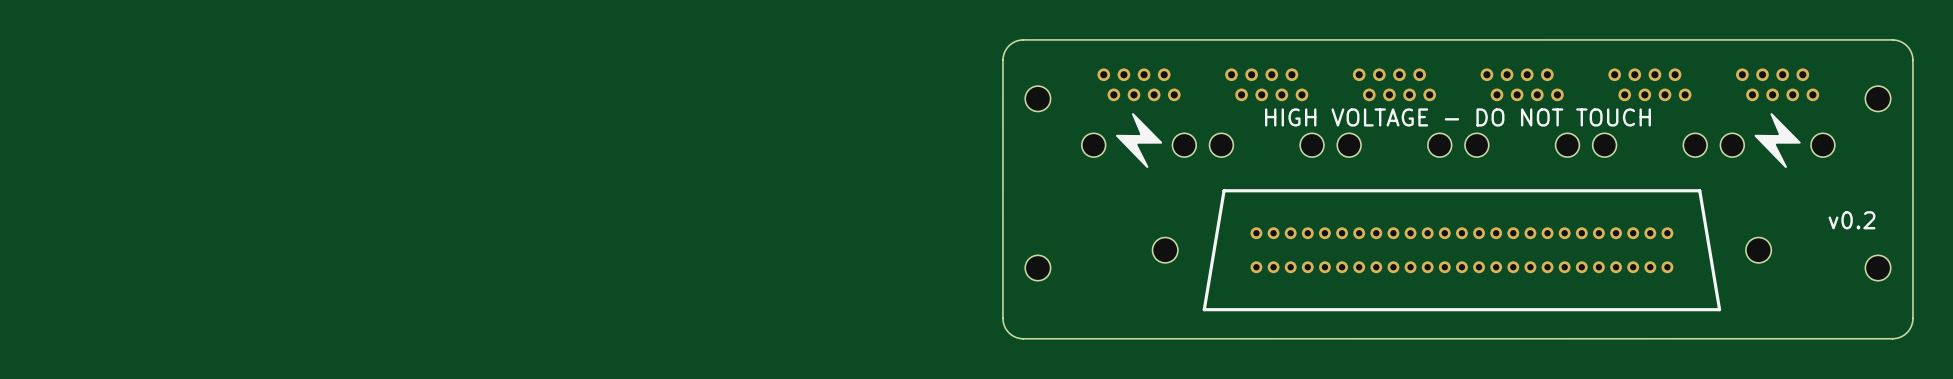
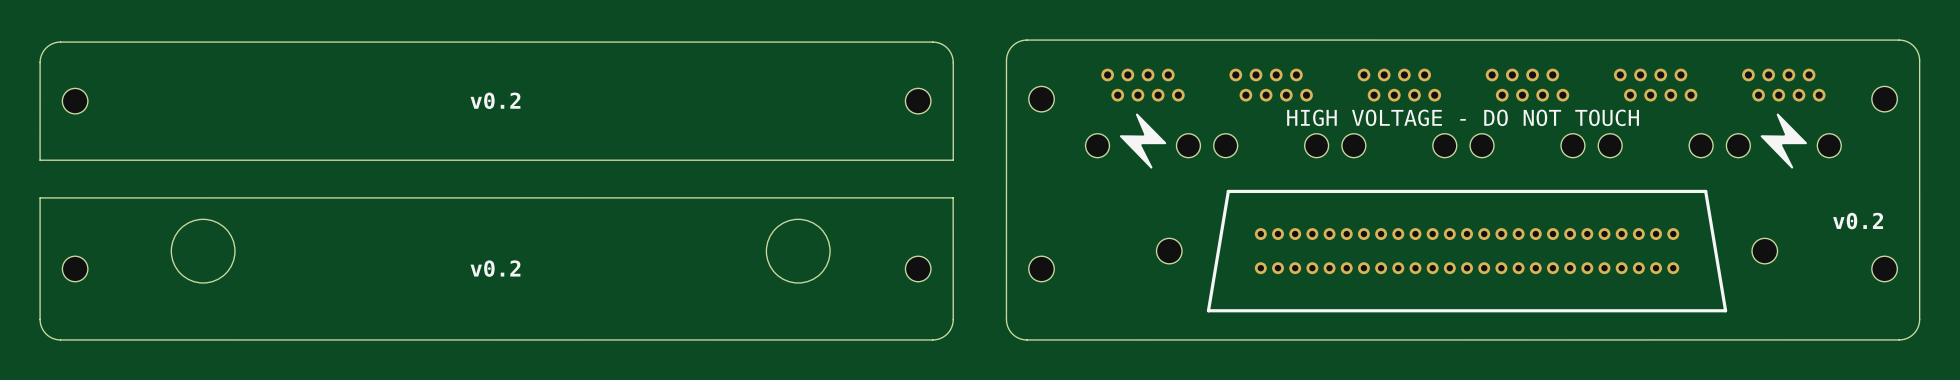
board edge: none -> (932, 42) (57, 42) (46, 48) (40, 59) (40, 160) (953, 160) (953, 59) (947, 48) (940, 43) (932, 42)
part: none -> (75, 101)
text: none -> v0.2 (495, 100)
part: none -> (918, 101)
board edge: none -> (953, 197) (953, 322) (947, 333) (935, 339) (60, 339) (52, 338) (46, 333) (40, 322) (40, 197) (953, 197)
round board edge: none -> [171, 219, 236, 284]
round board edge: none -> [766, 219, 831, 284]
text: none -> v0.2 (495, 268)
part: none -> (75, 268)
part: none -> (918, 268)

